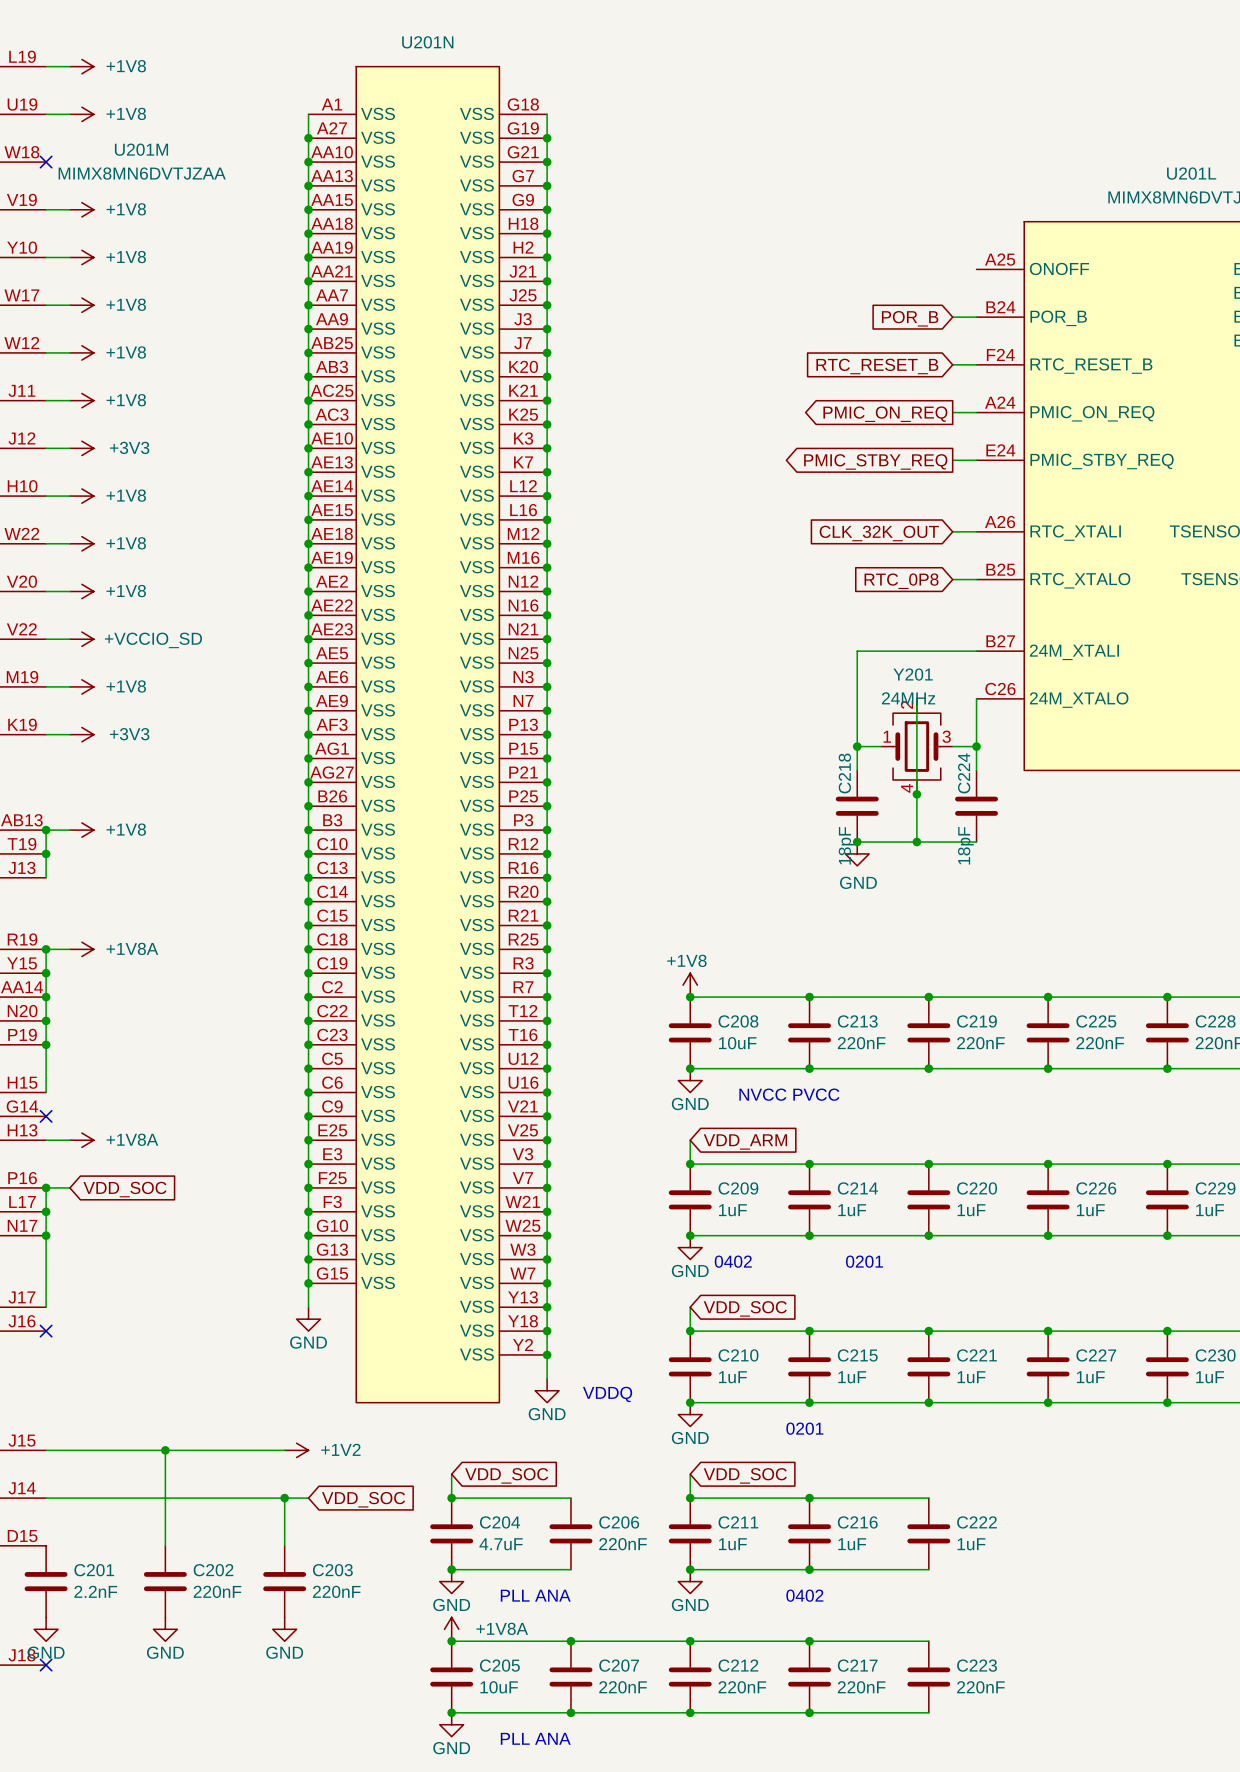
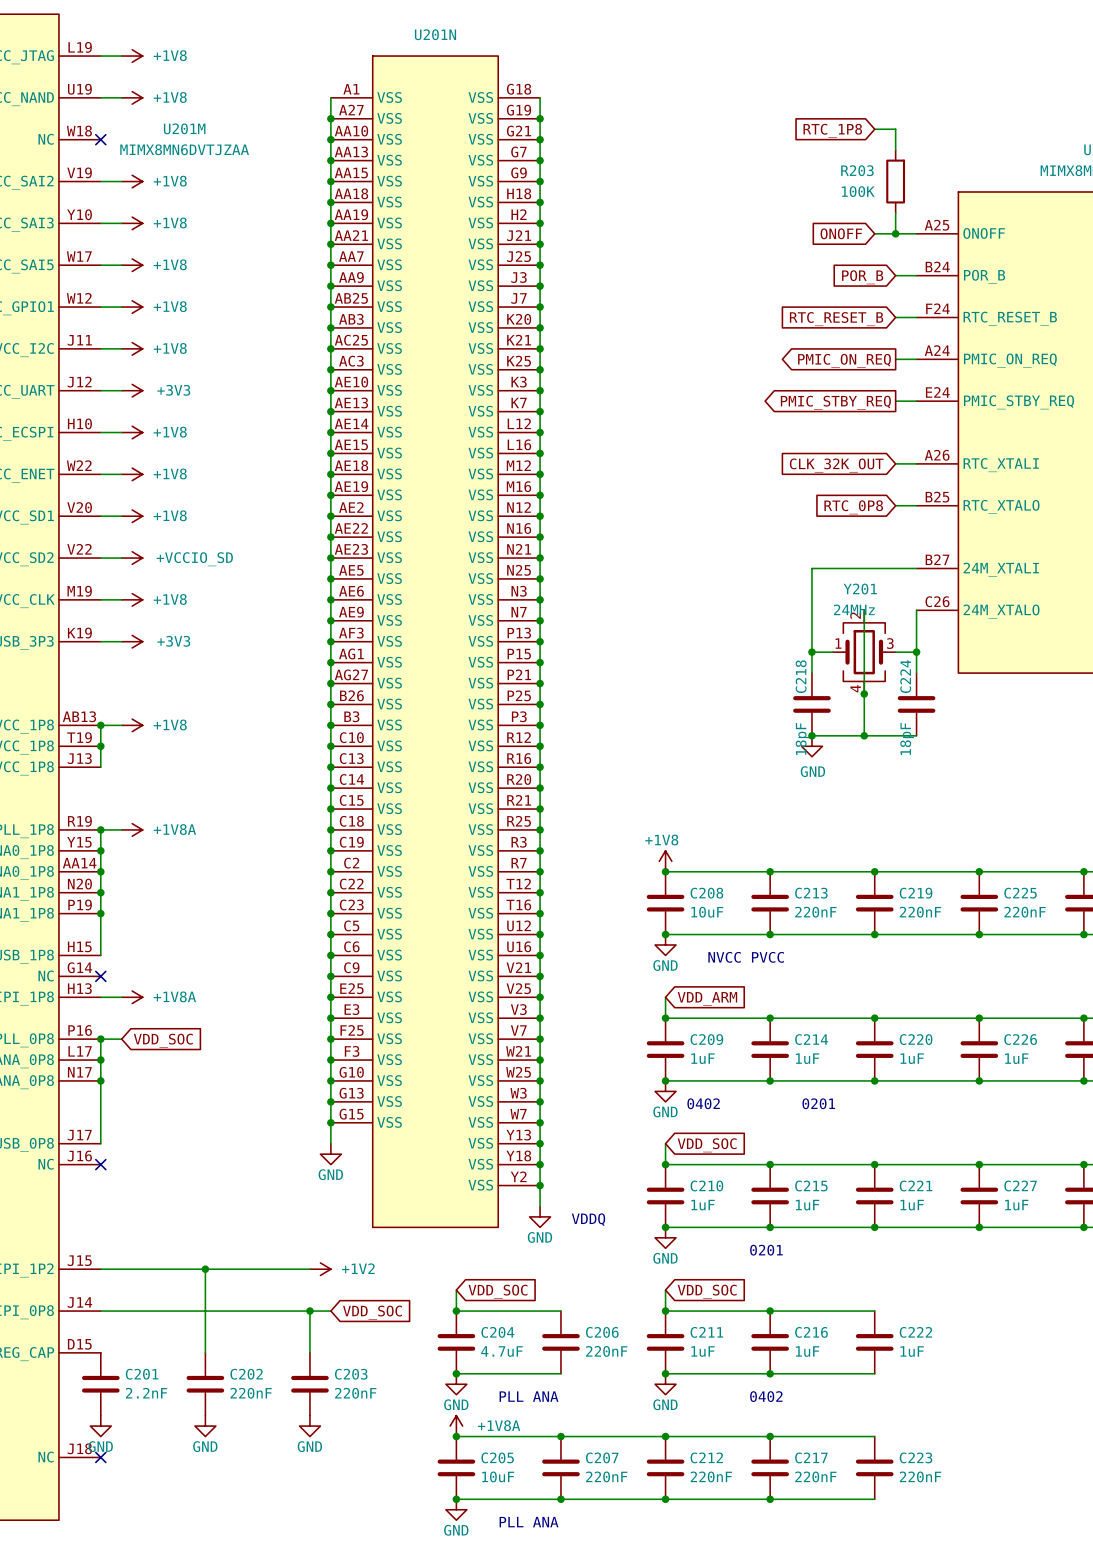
wire: none -> (874, 129) (895, 129) (895, 150)
global label: none -> RTC_1P8 (832, 130)
R203: none -> 100K (895, 181)
wire: none -> (895, 212) (895, 233)
global label: none -> ONOFF (841, 233)
wire: none -> (874, 233) (916, 233)
junction: none -> (895, 233)

